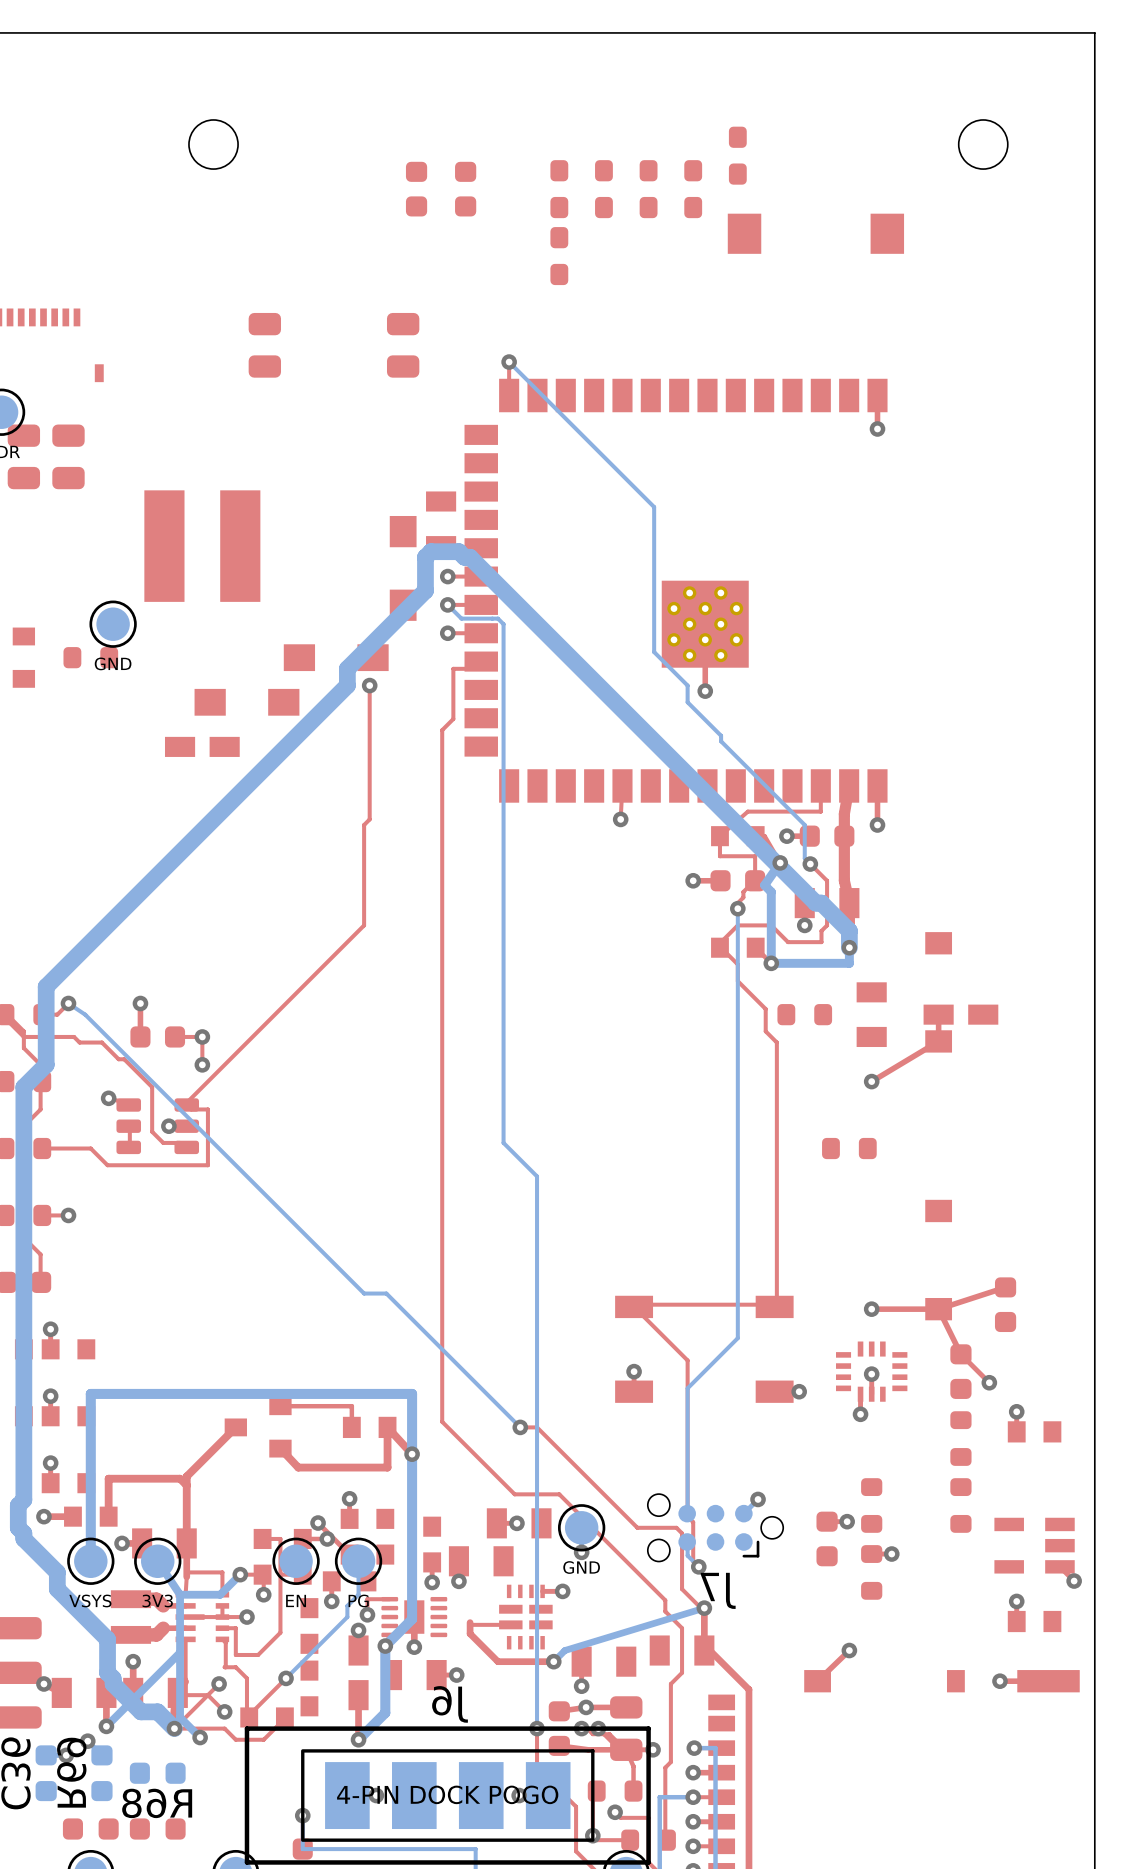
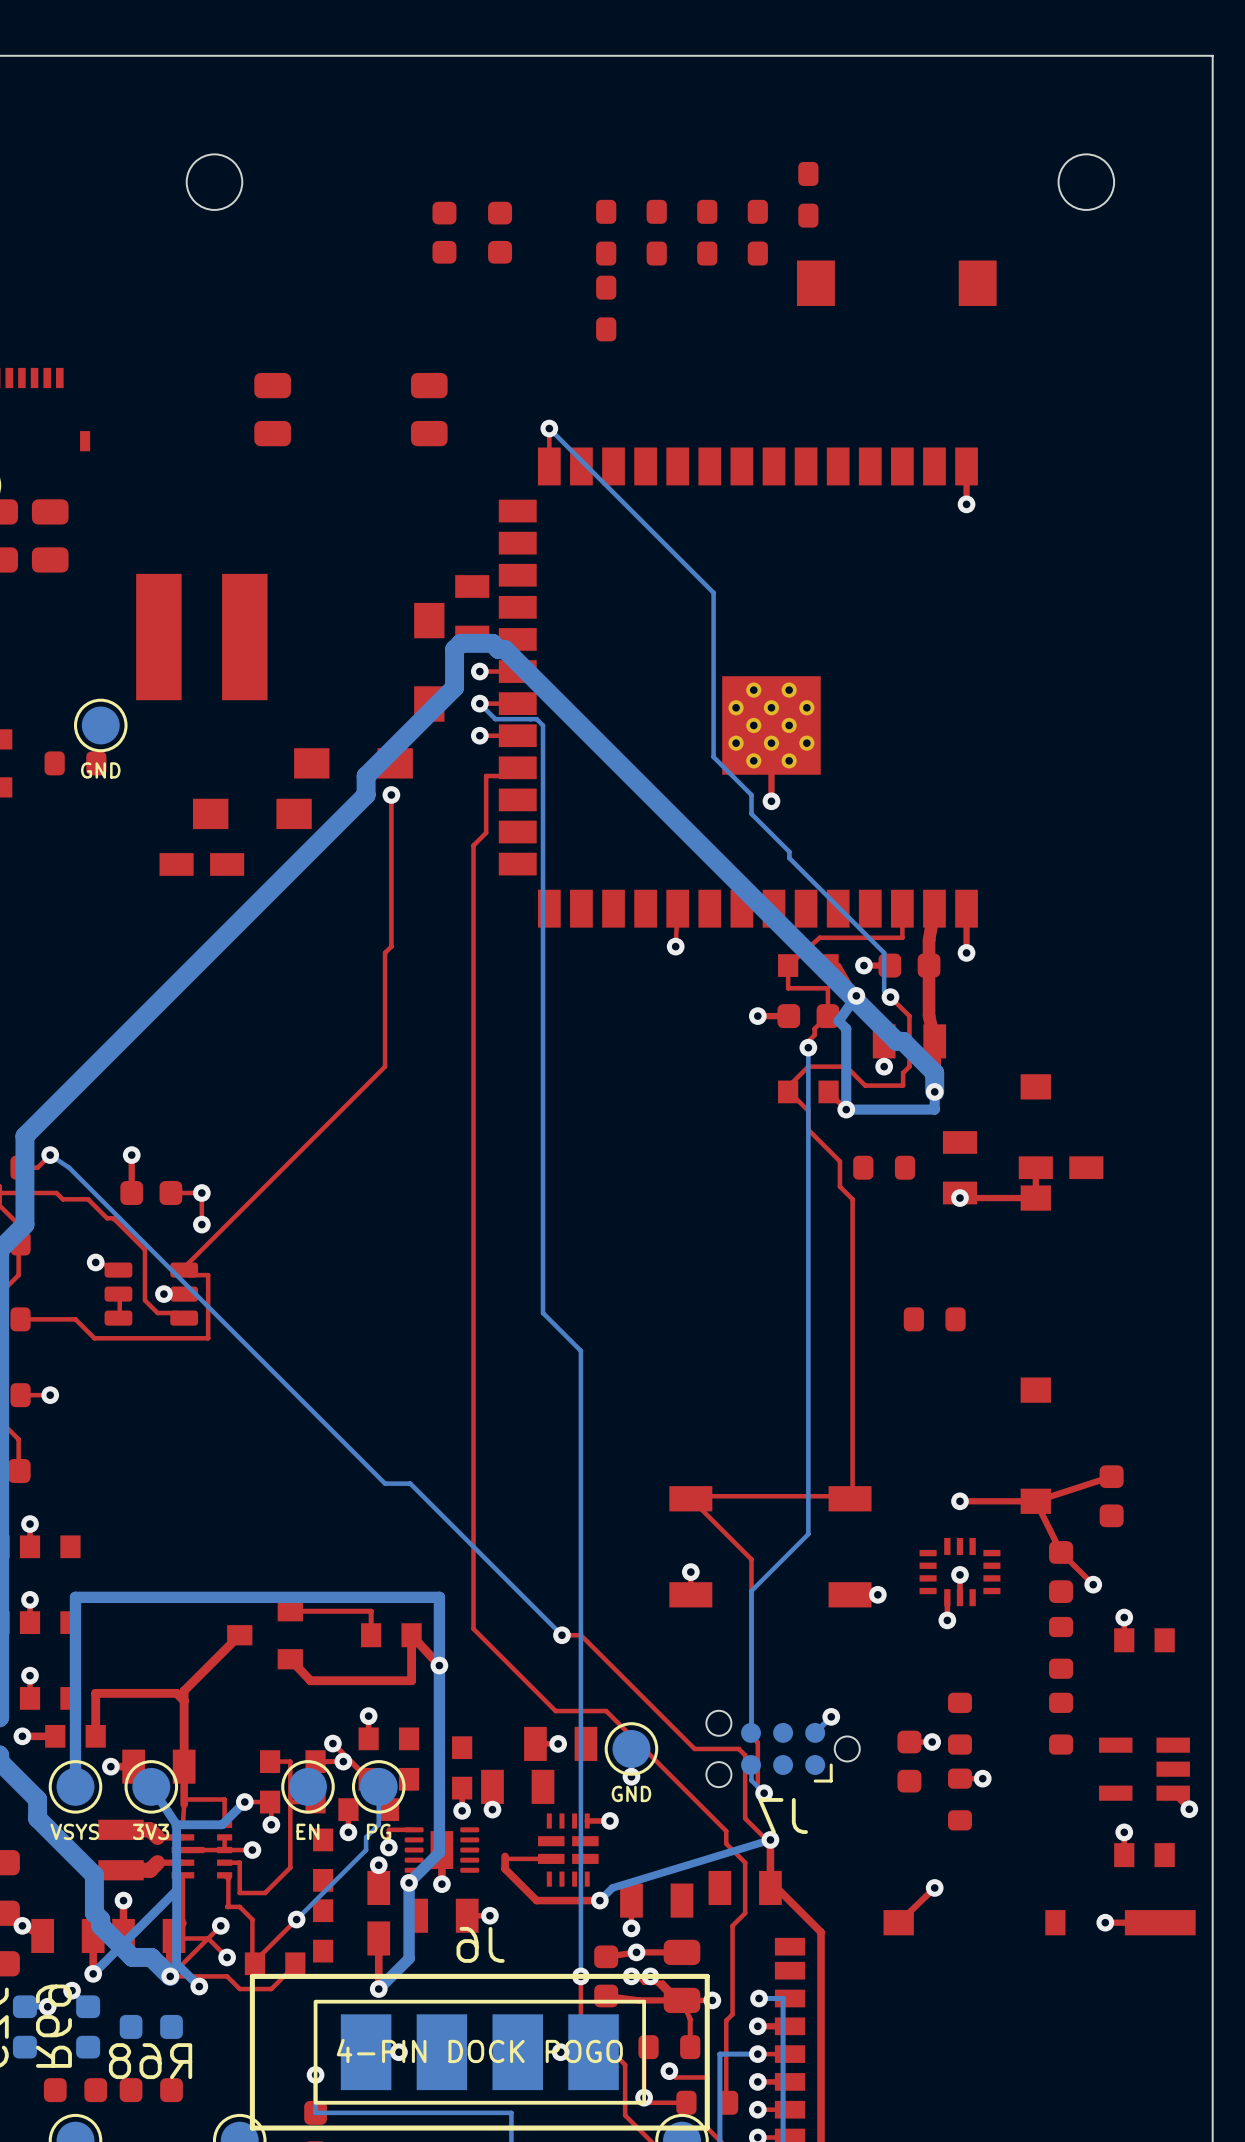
top track: (938, 1041) (871, 1081) -> (1035, 1198) (959, 1198)
via position: (871, 1081) -> (959, 1198)

